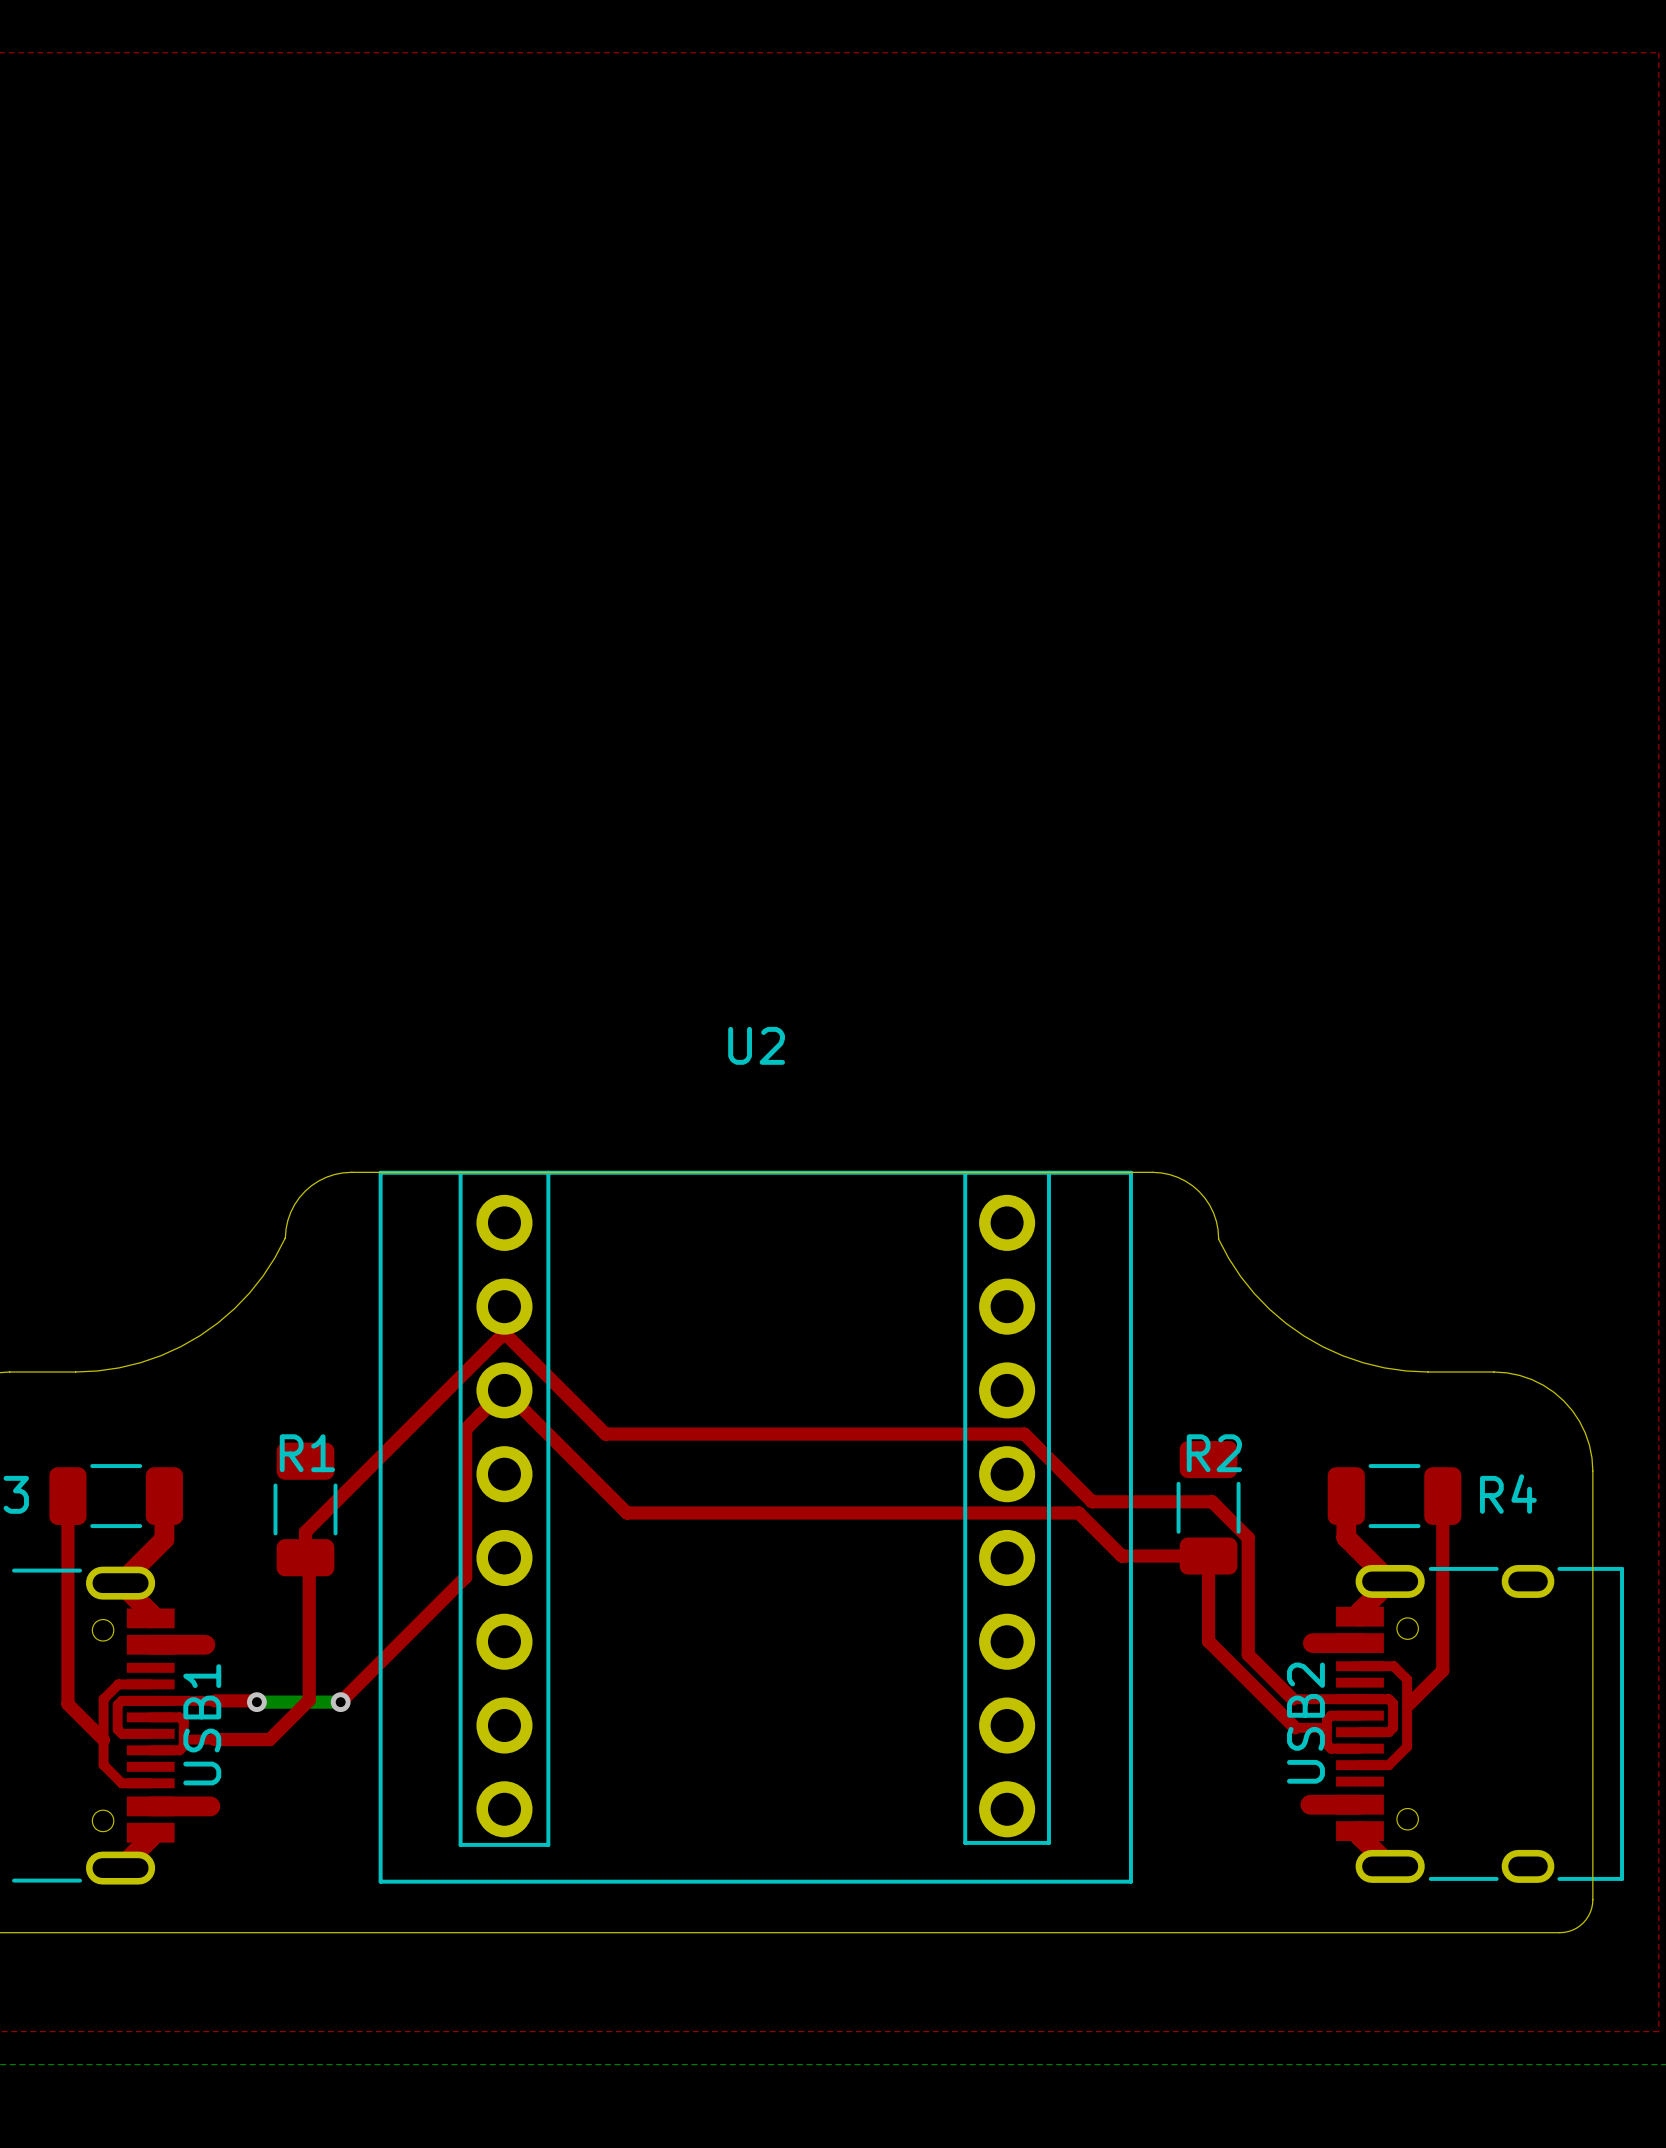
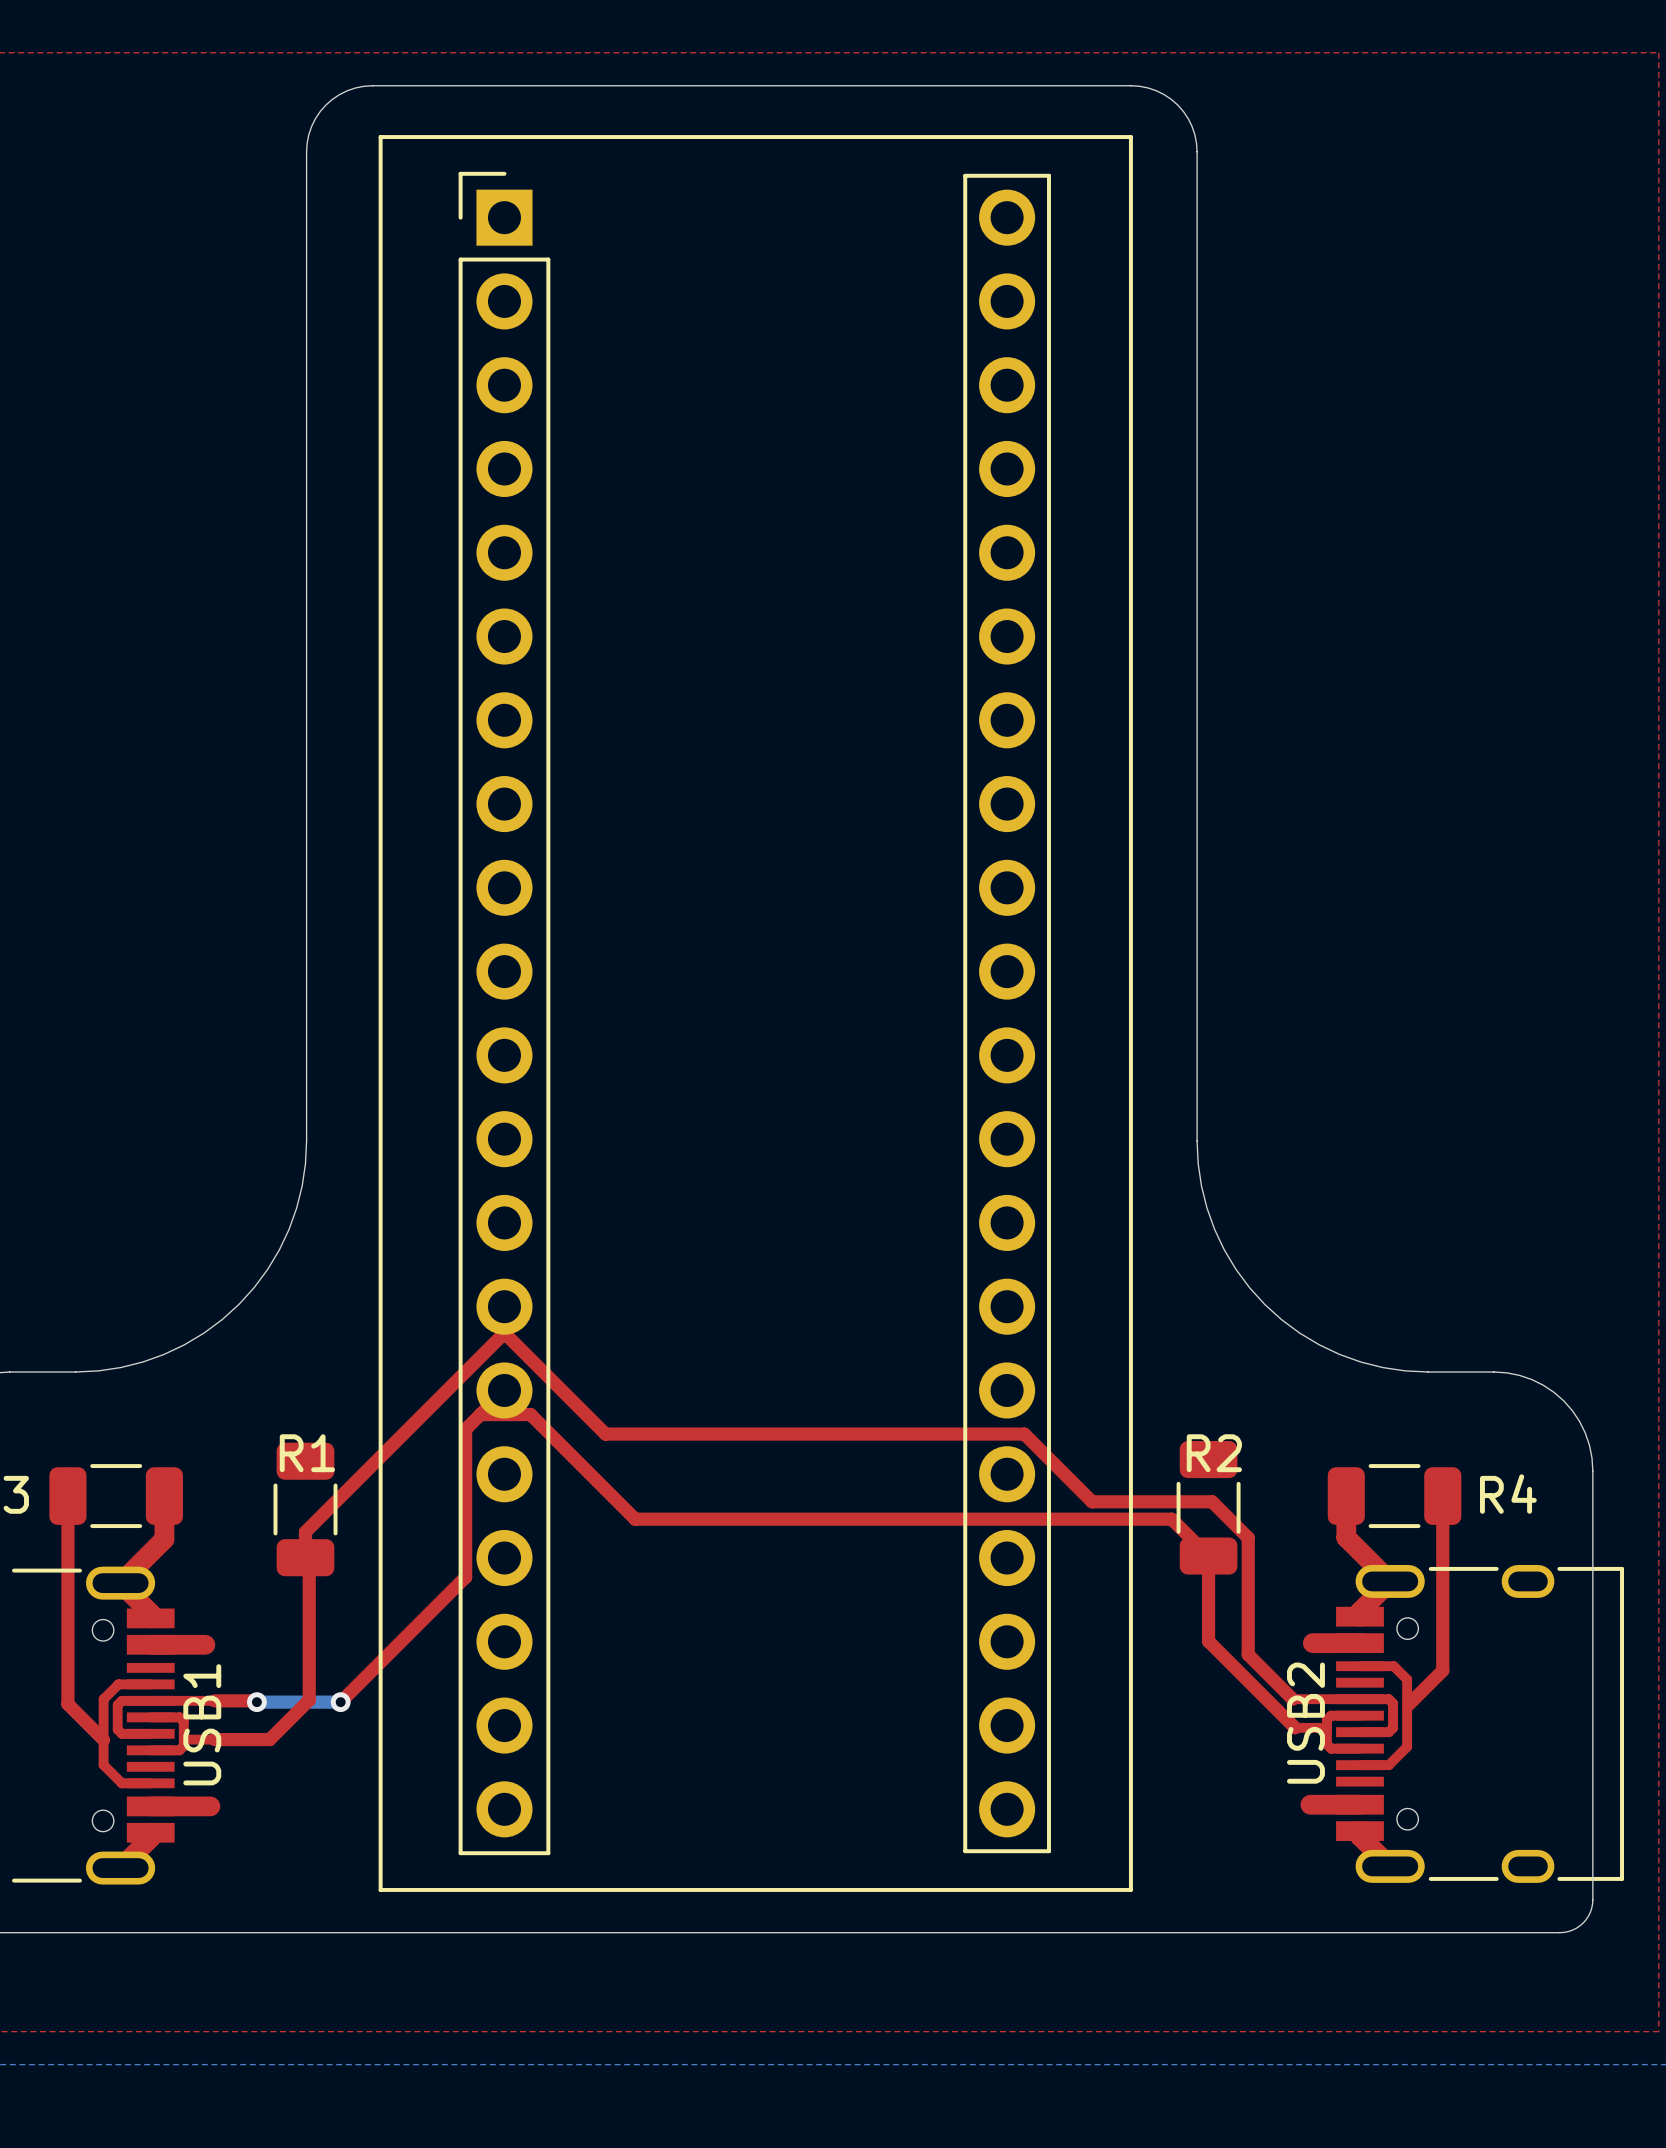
part: none -> (755, 1013)
board edge: (75, 1372) (97, 1370) (140, 1362) (181, 1346) (217, 1323) (234, 1308) (263, 1275) (285, 1238) (287, 1220) (299, 1197) (318, 1181) (342, 1172) (1152, 1172) (1177, 1177) (1199, 1191) (1213, 1213) (1218, 1239) (1240, 1276) (1254, 1293) (1286, 1323) (1322, 1346) (1363, 1362) (1384, 1367) (1427, 1372) -> (75, 1372) (120, 1367) (142, 1362) (184, 1344) (222, 1319) (254, 1287) (279, 1249) (289, 1229) (302, 1186) (306, 1141) (306, 151) (311, 126) (325, 105) (347, 90) (372, 85) (1131, 85) (1148, 87) (1164, 94) (1183, 111) (1192, 126) (1197, 151) (1197, 1141) (1201, 1186) (1214, 1229) (1224, 1249) (1249, 1287) (1281, 1319) (1319, 1344) (1360, 1362) (1382, 1367) (1427, 1372)
top track: (504, 1390) (627, 1513) (1078, 1513) (1121, 1556) (1208, 1556) -> (480, 1414) (530, 1414) (635, 1519) (1171, 1519) (1208, 1556)
U2: (755, 1527) -> none

